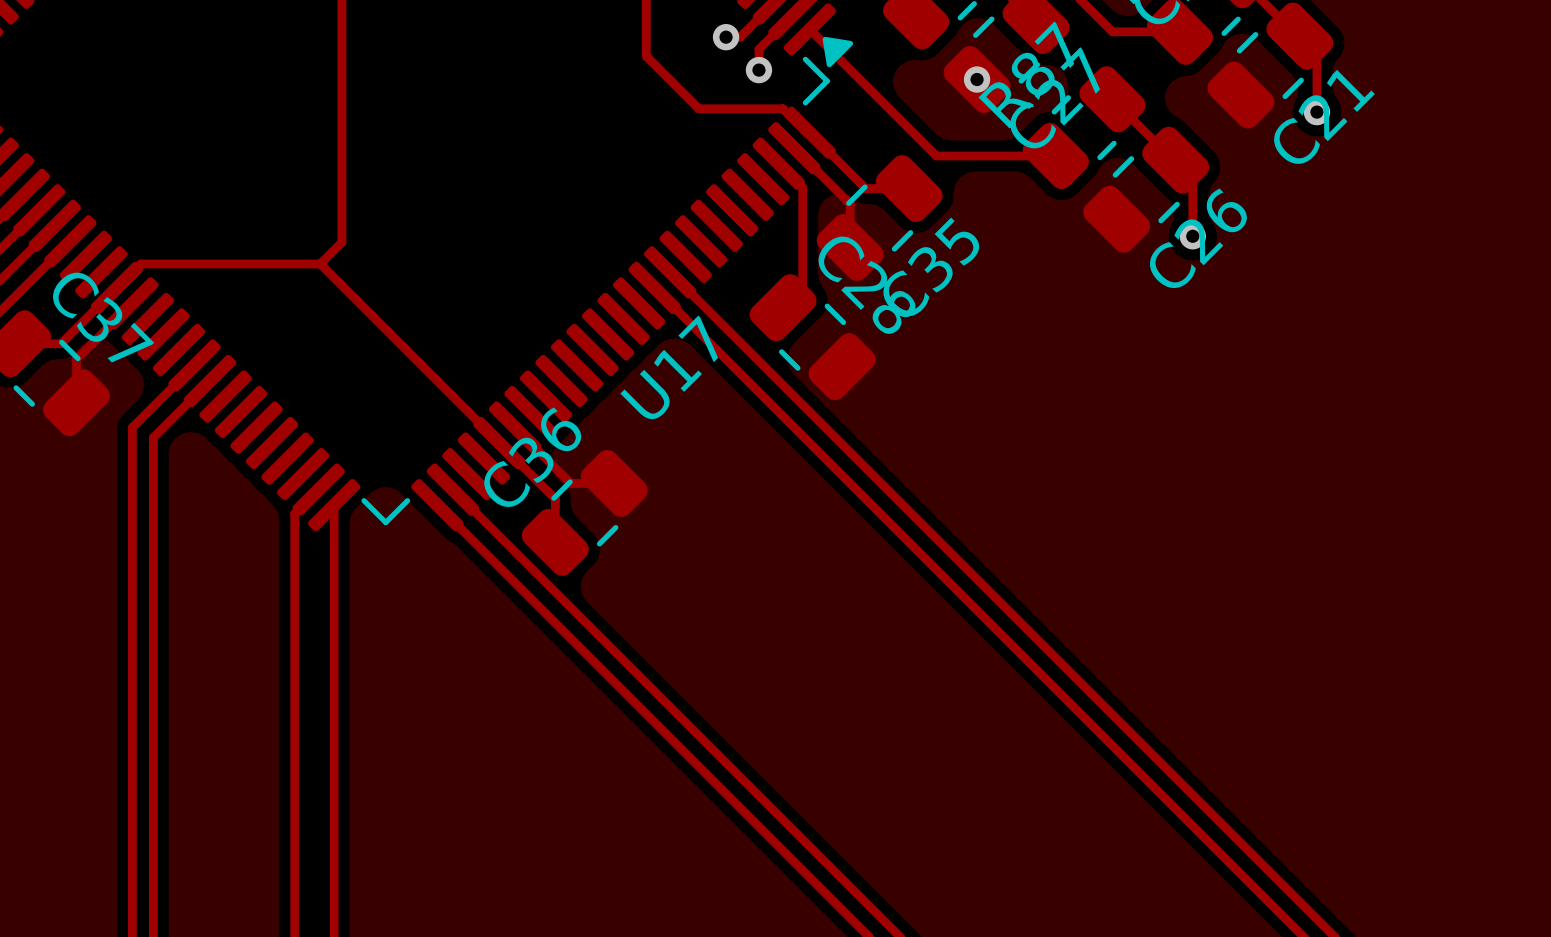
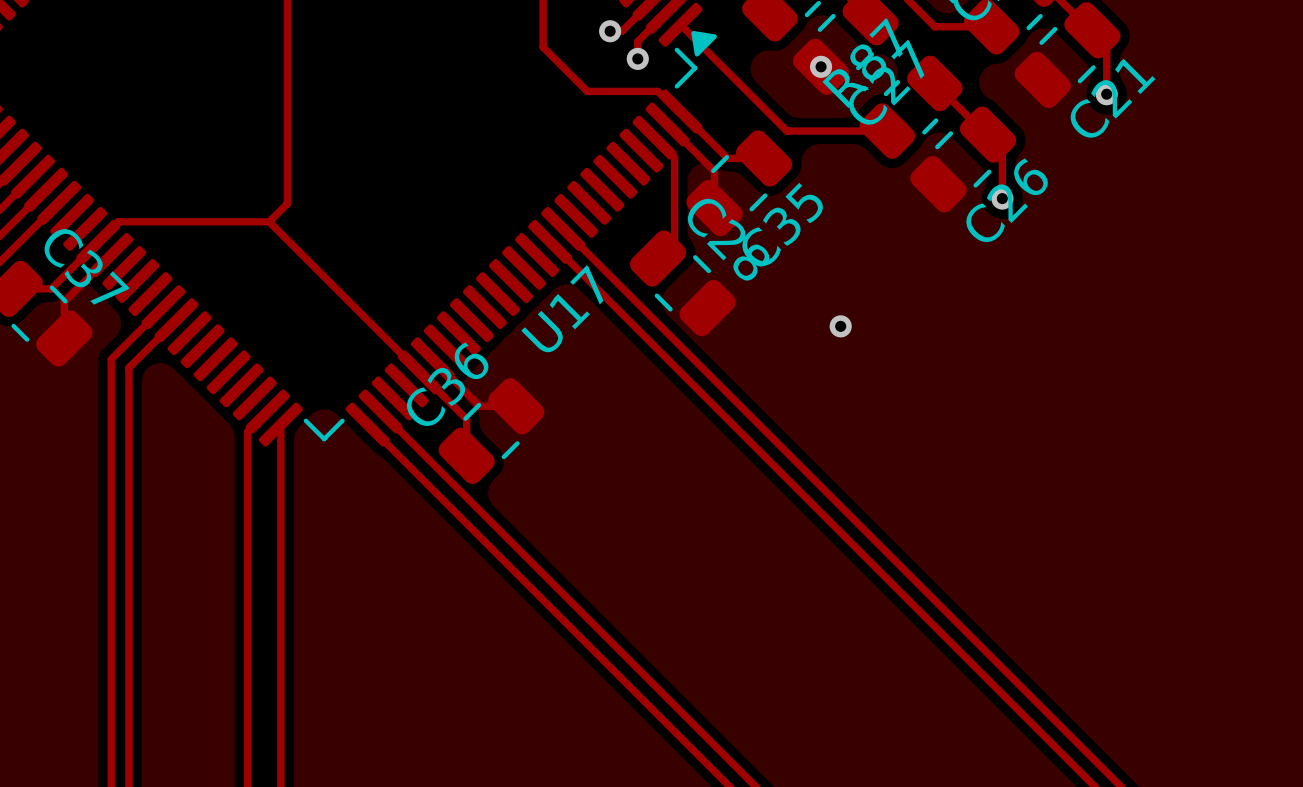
via: none -> (840, 326)

